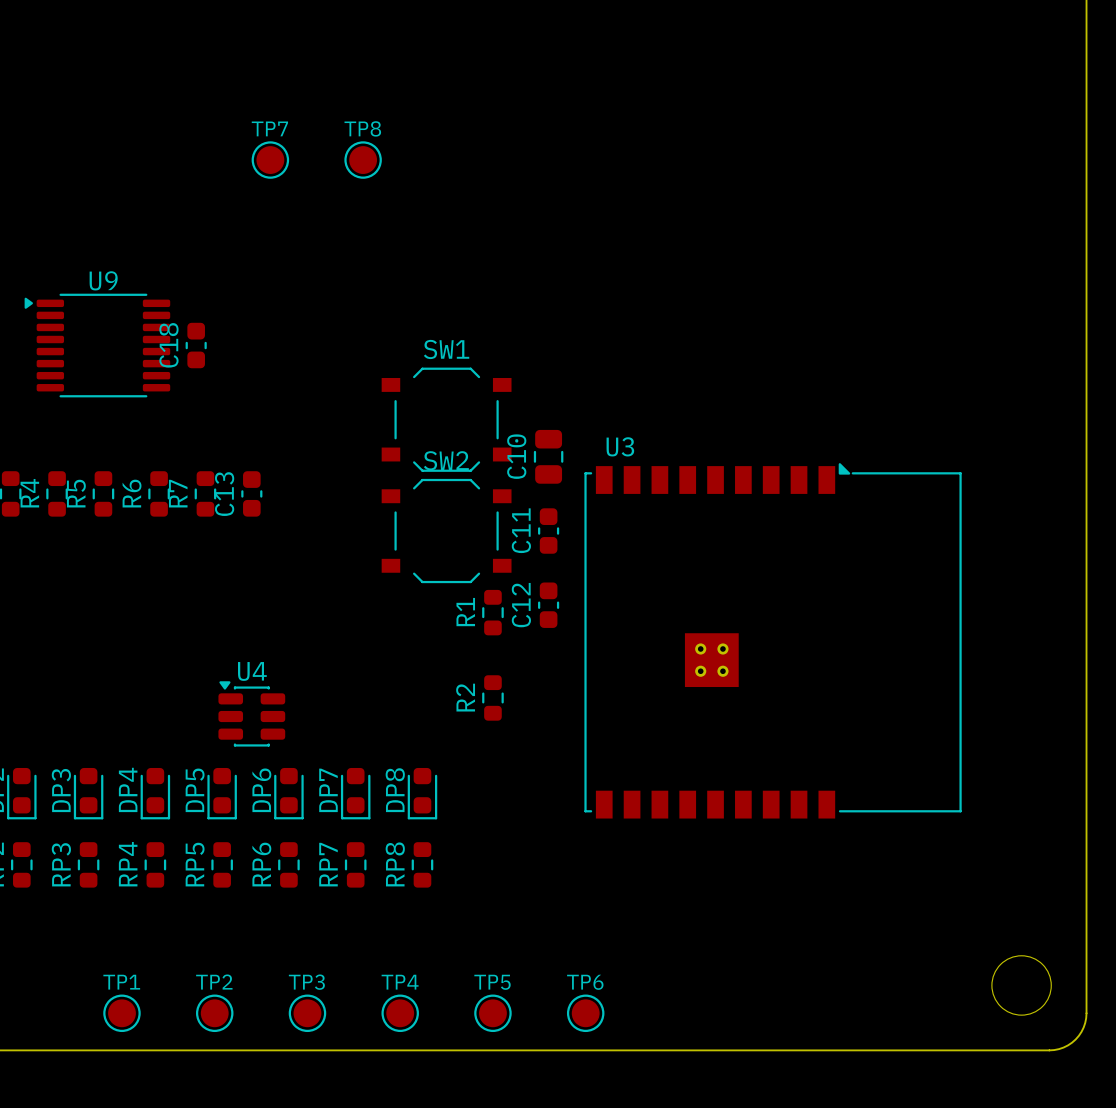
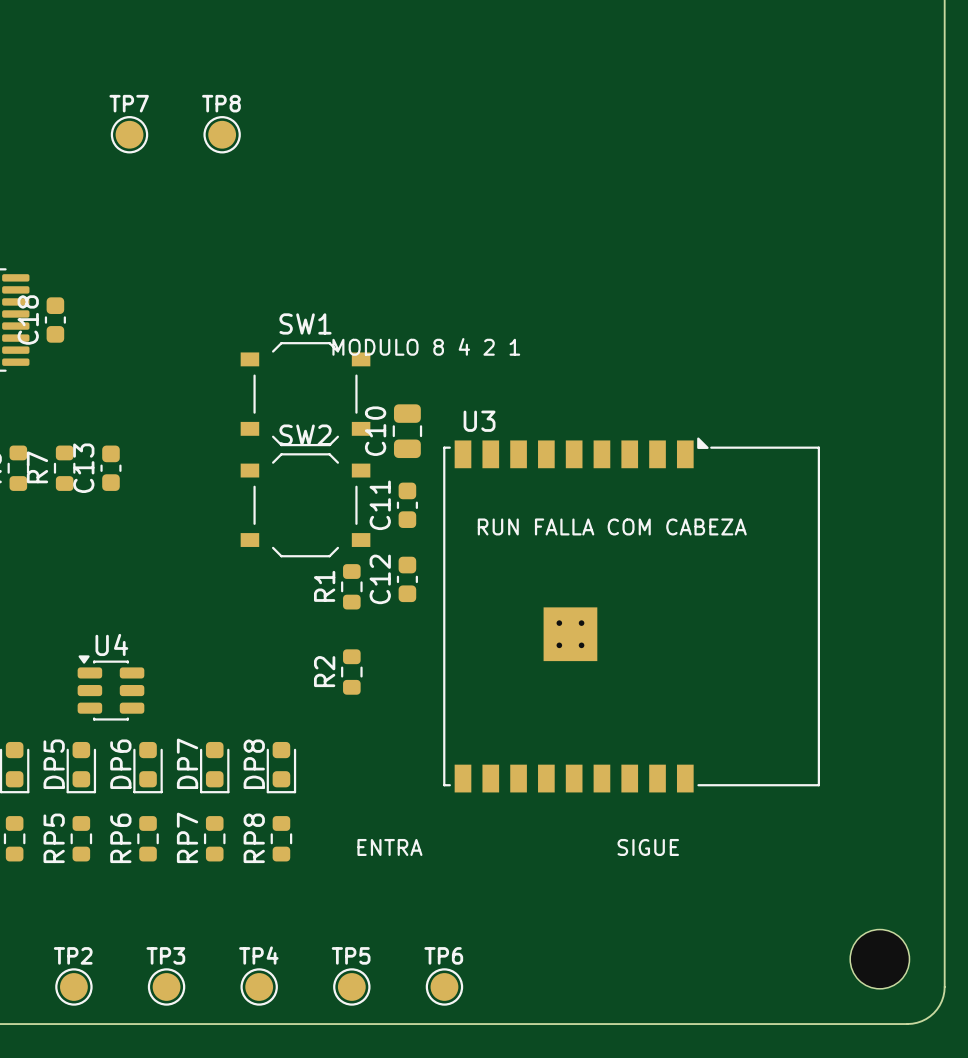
text: none -> MODULO 8 4 2 1 (426, 346)
text: none -> RUN FALLA COM CABEZA (612, 526)
text: none -> ENTRA (389, 847)
text: none -> SIGUE (648, 847)

